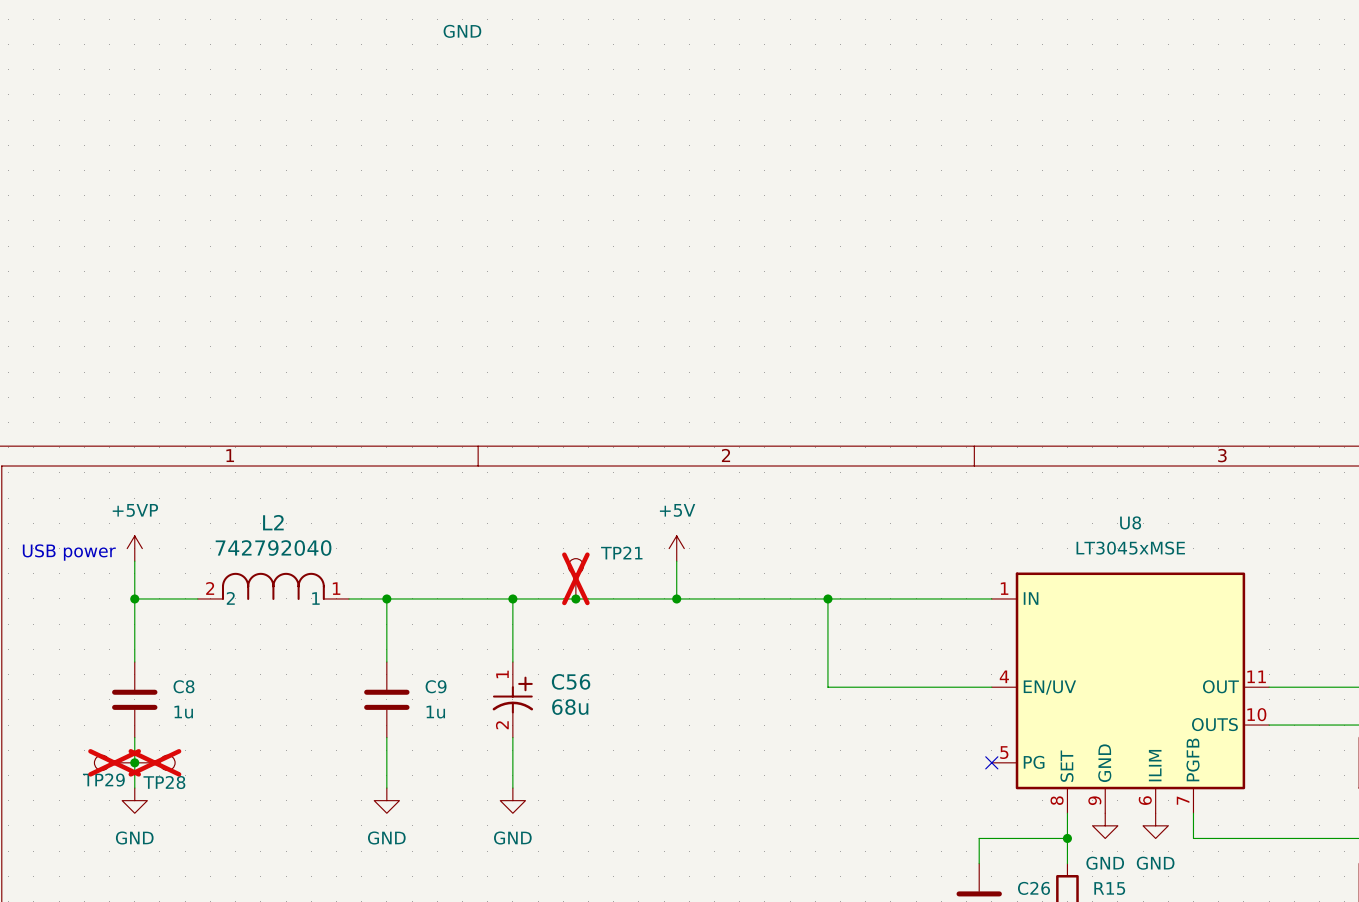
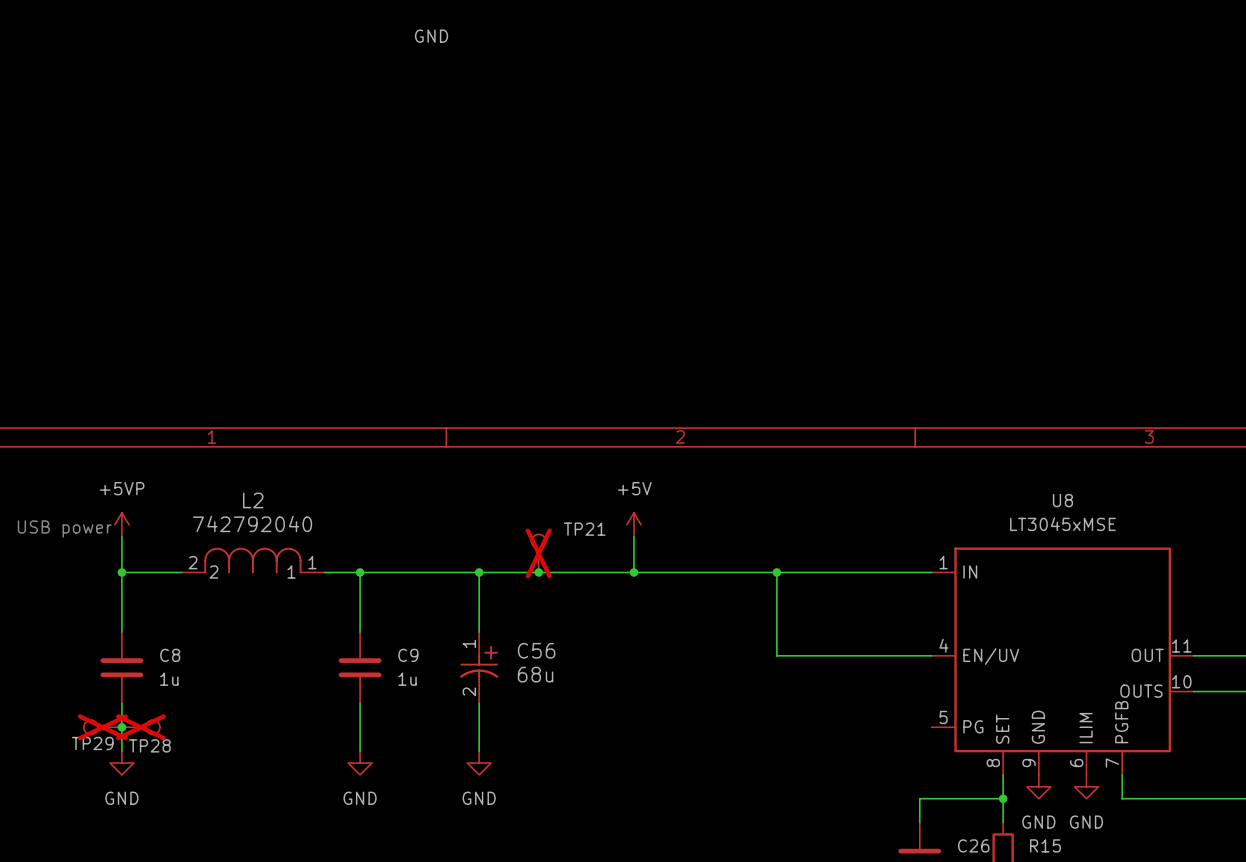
no-connect mark: (991, 762) -> none

